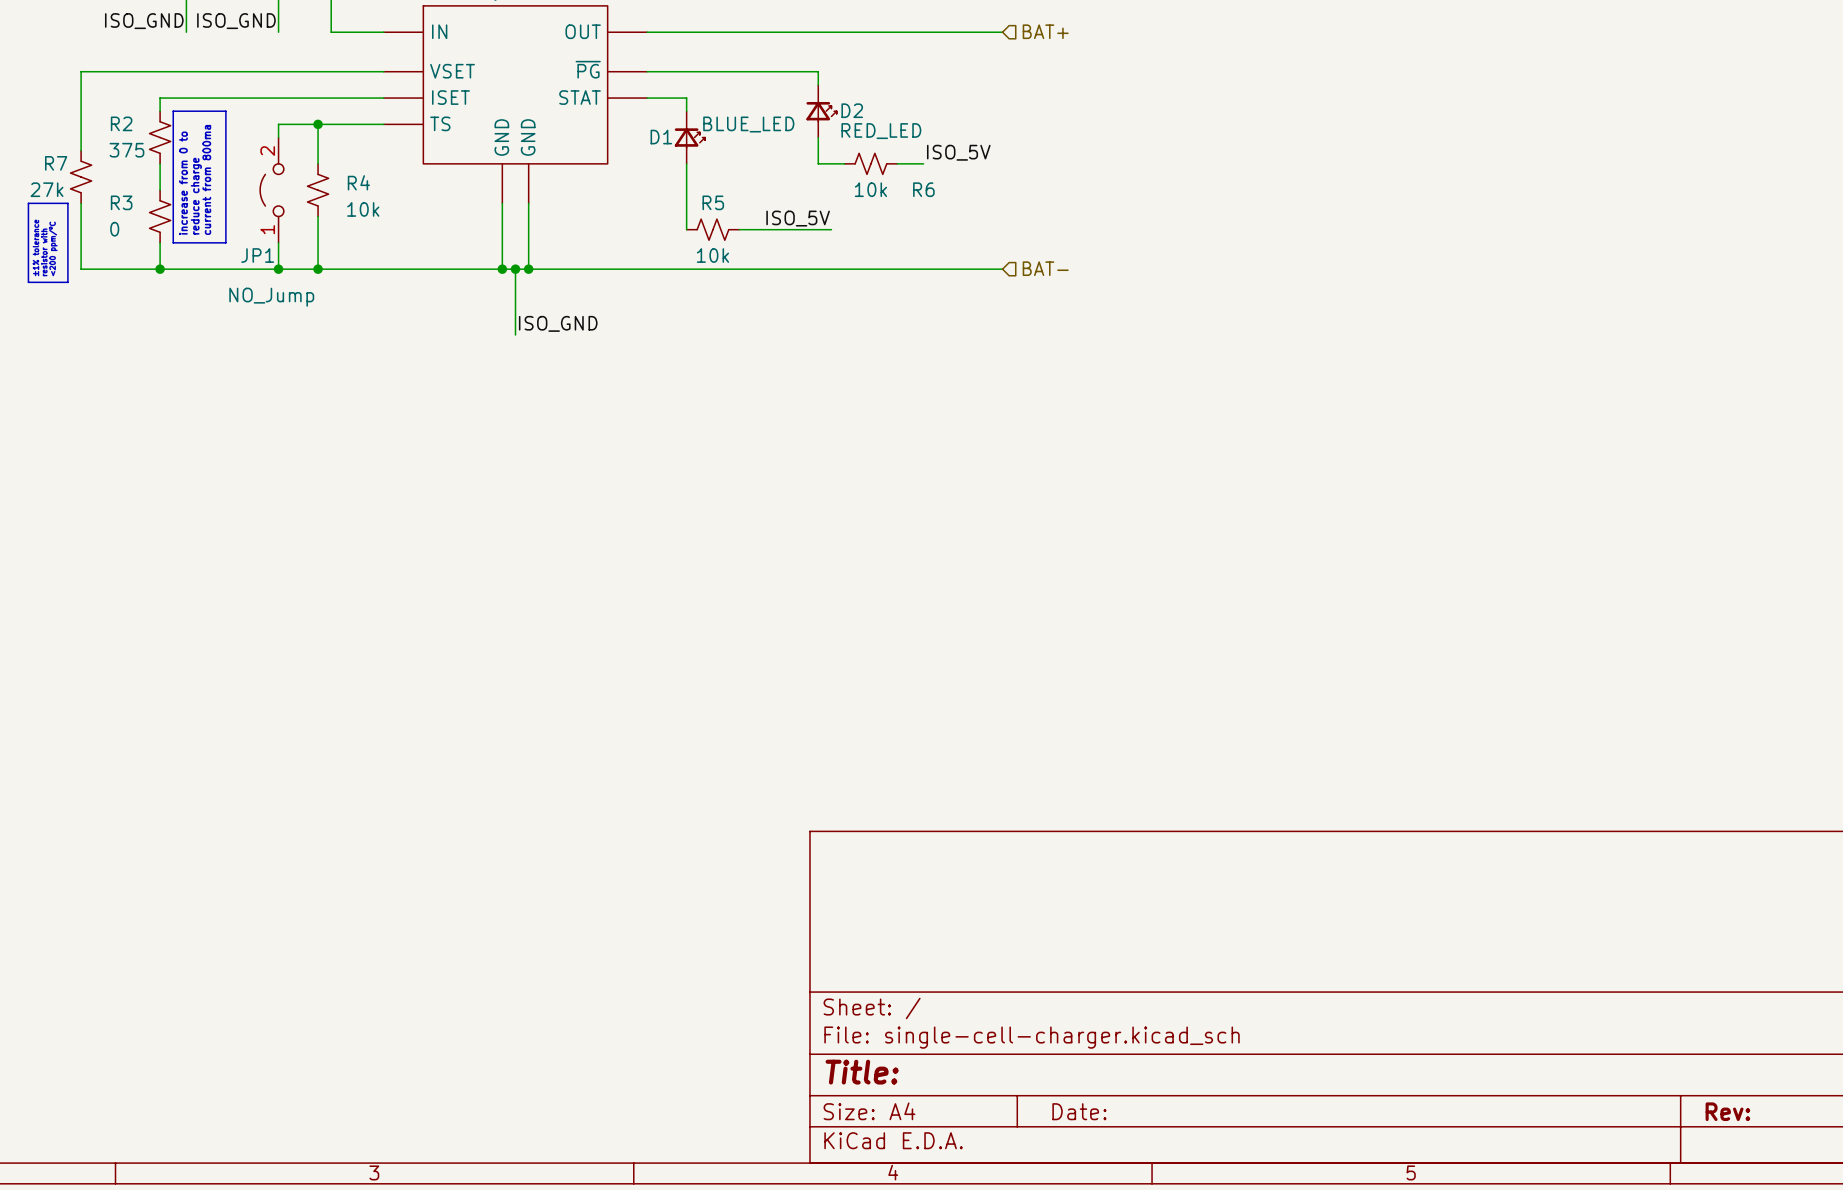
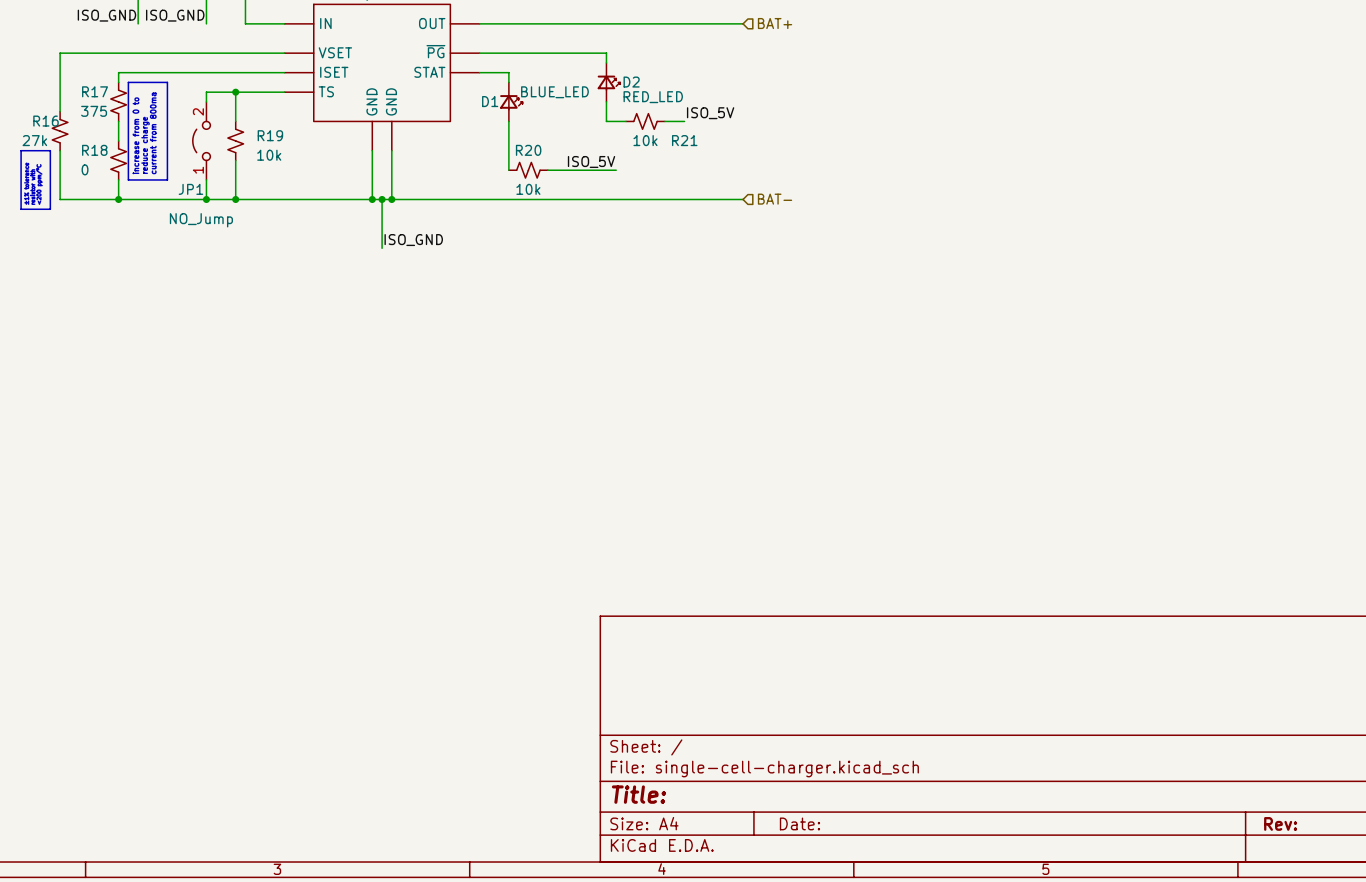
R2 name: R2 (121, 123) -> R17 (95, 91)
R7 name: R7 (56, 163) -> R16 (46, 121)
R4 name: R4 (358, 182) -> R19 (270, 135)
R6 name: R6 (923, 189) -> R21 (684, 140)
R3 name: R3 (121, 202) -> R18 (94, 150)
R5 name: R5 (713, 202) -> R20 (528, 150)

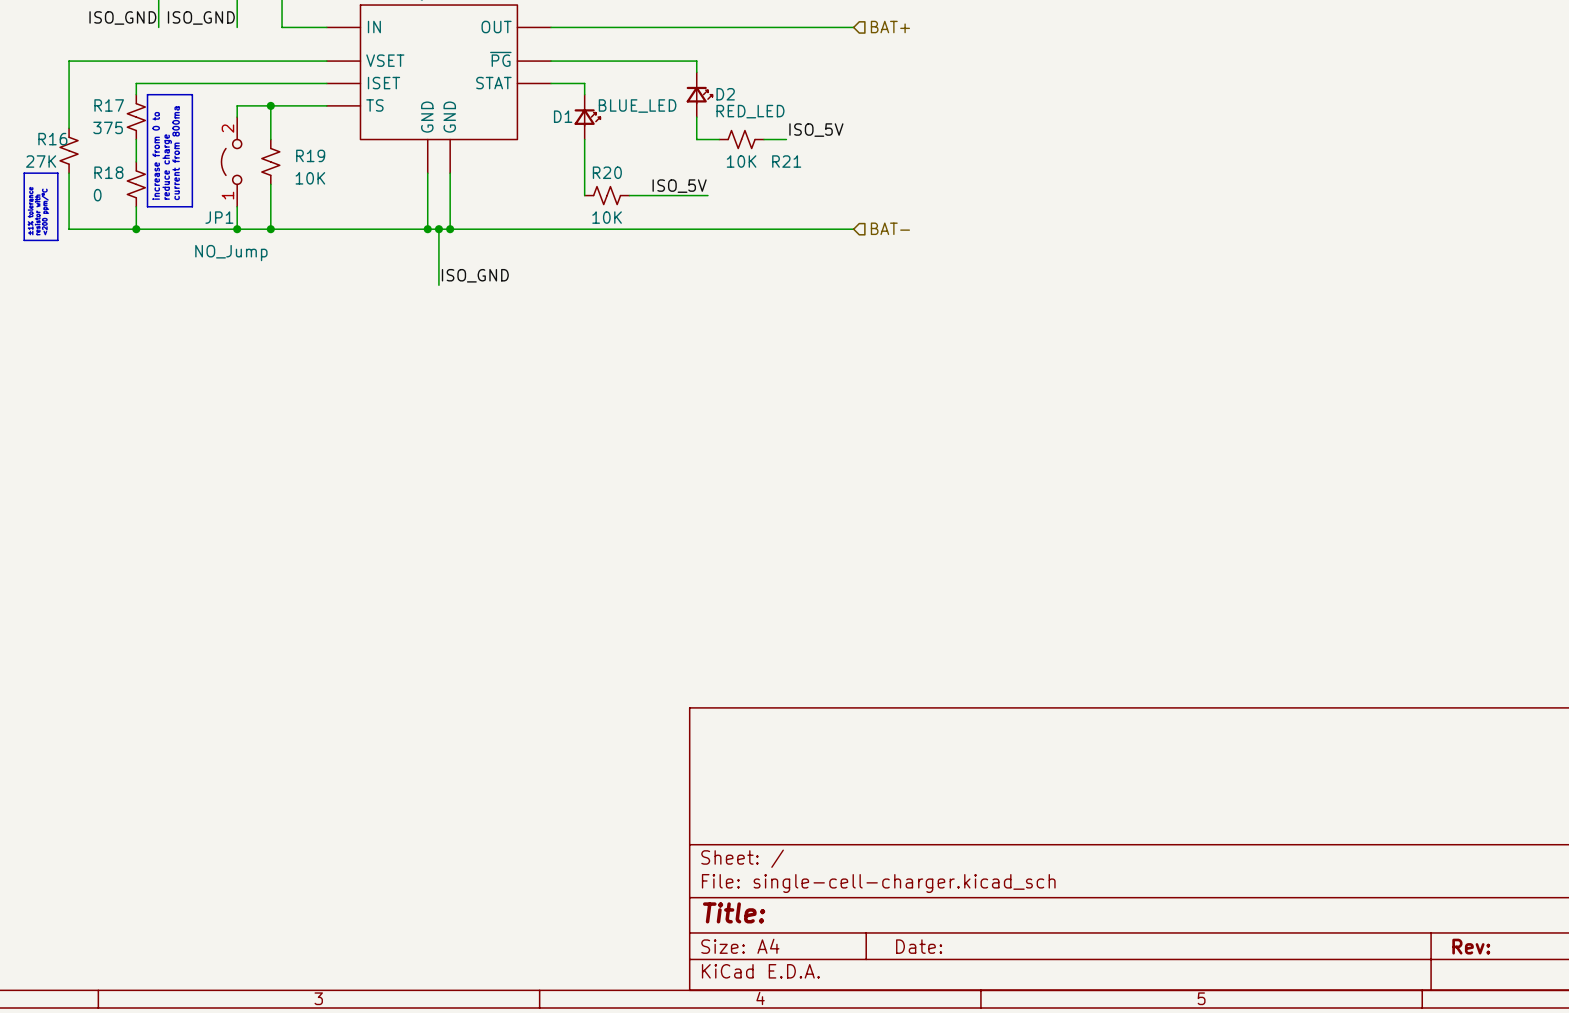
R16 value: 27k (34, 140) -> 27K (41, 161)
R21 value: 10k (645, 140) -> 10K (741, 161)
R19 value: 10k (269, 155) -> 10K (310, 178)
R20 value: 10k (528, 189) -> 10K (607, 217)

